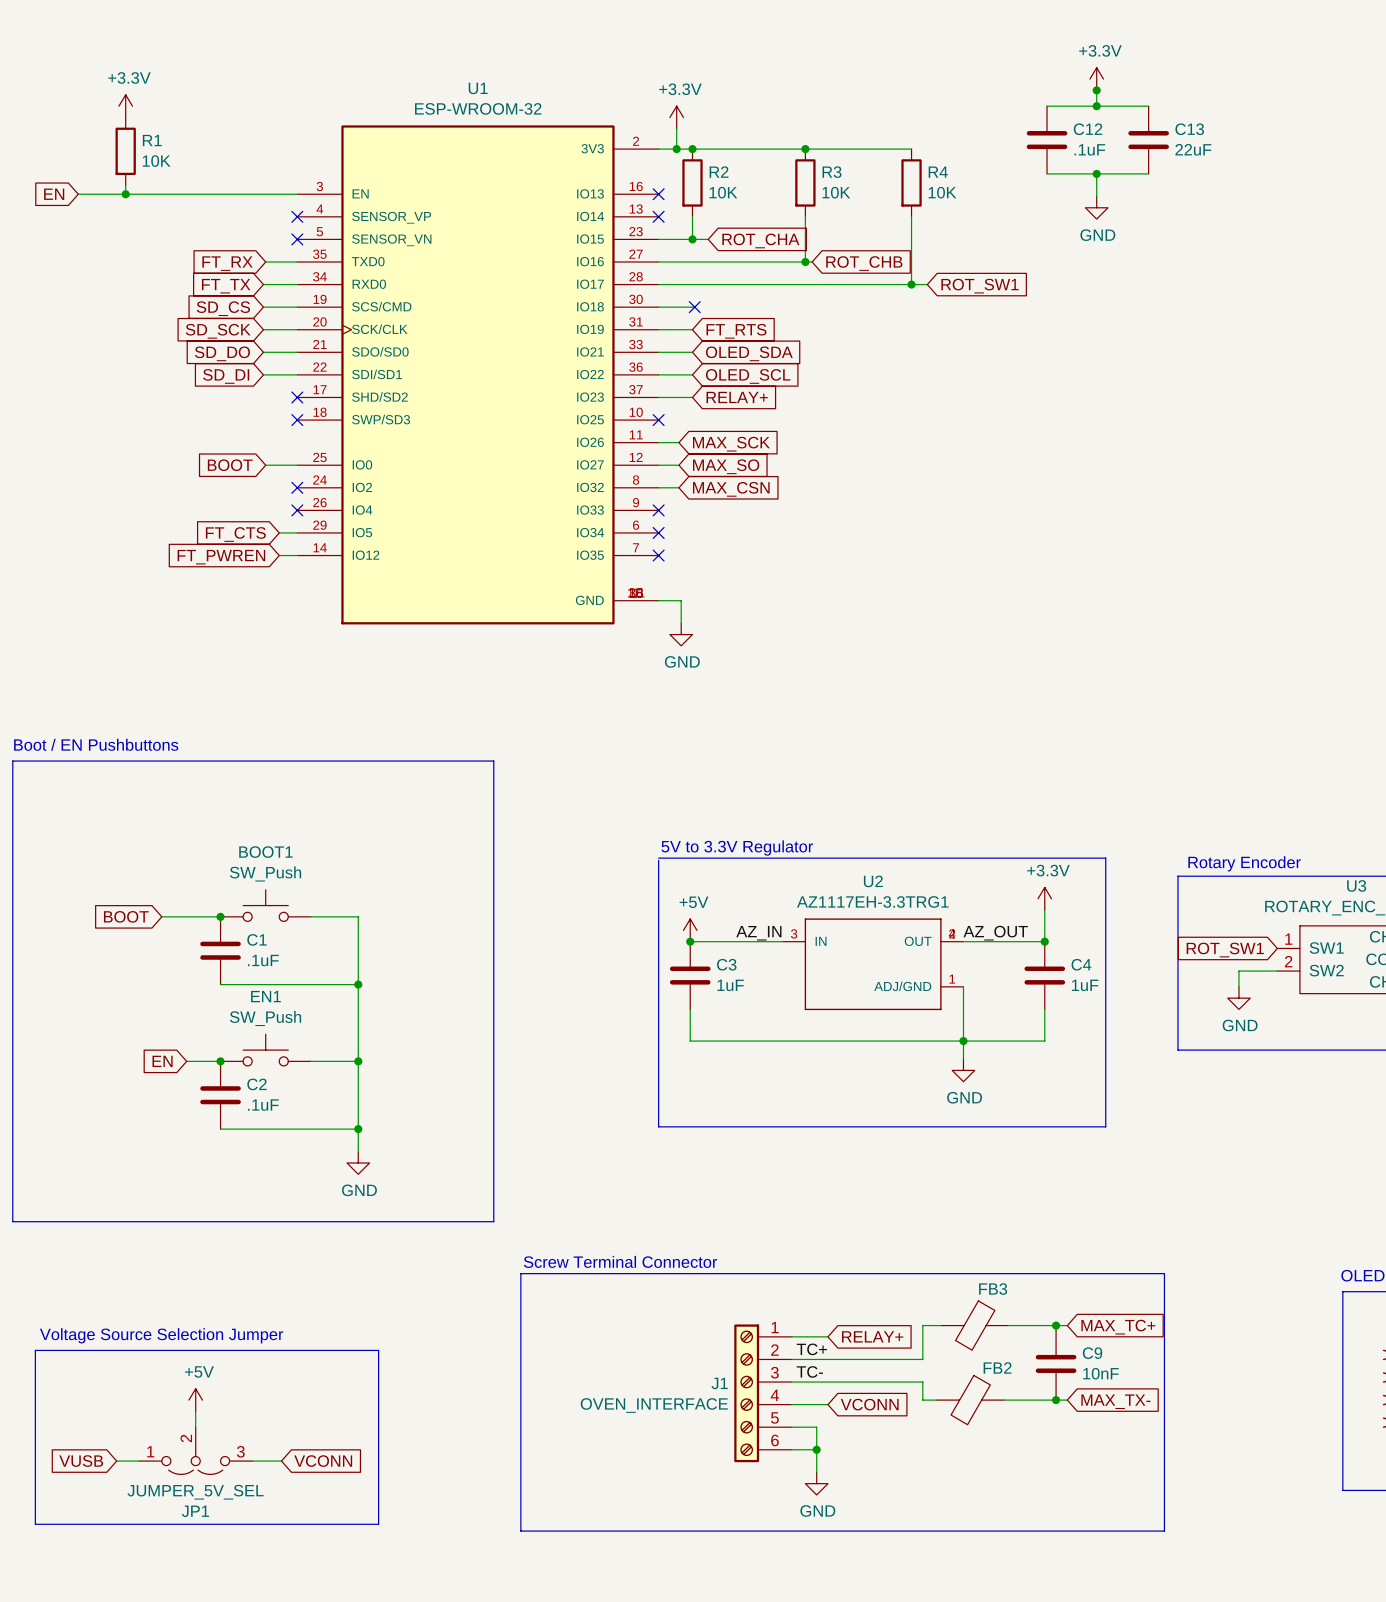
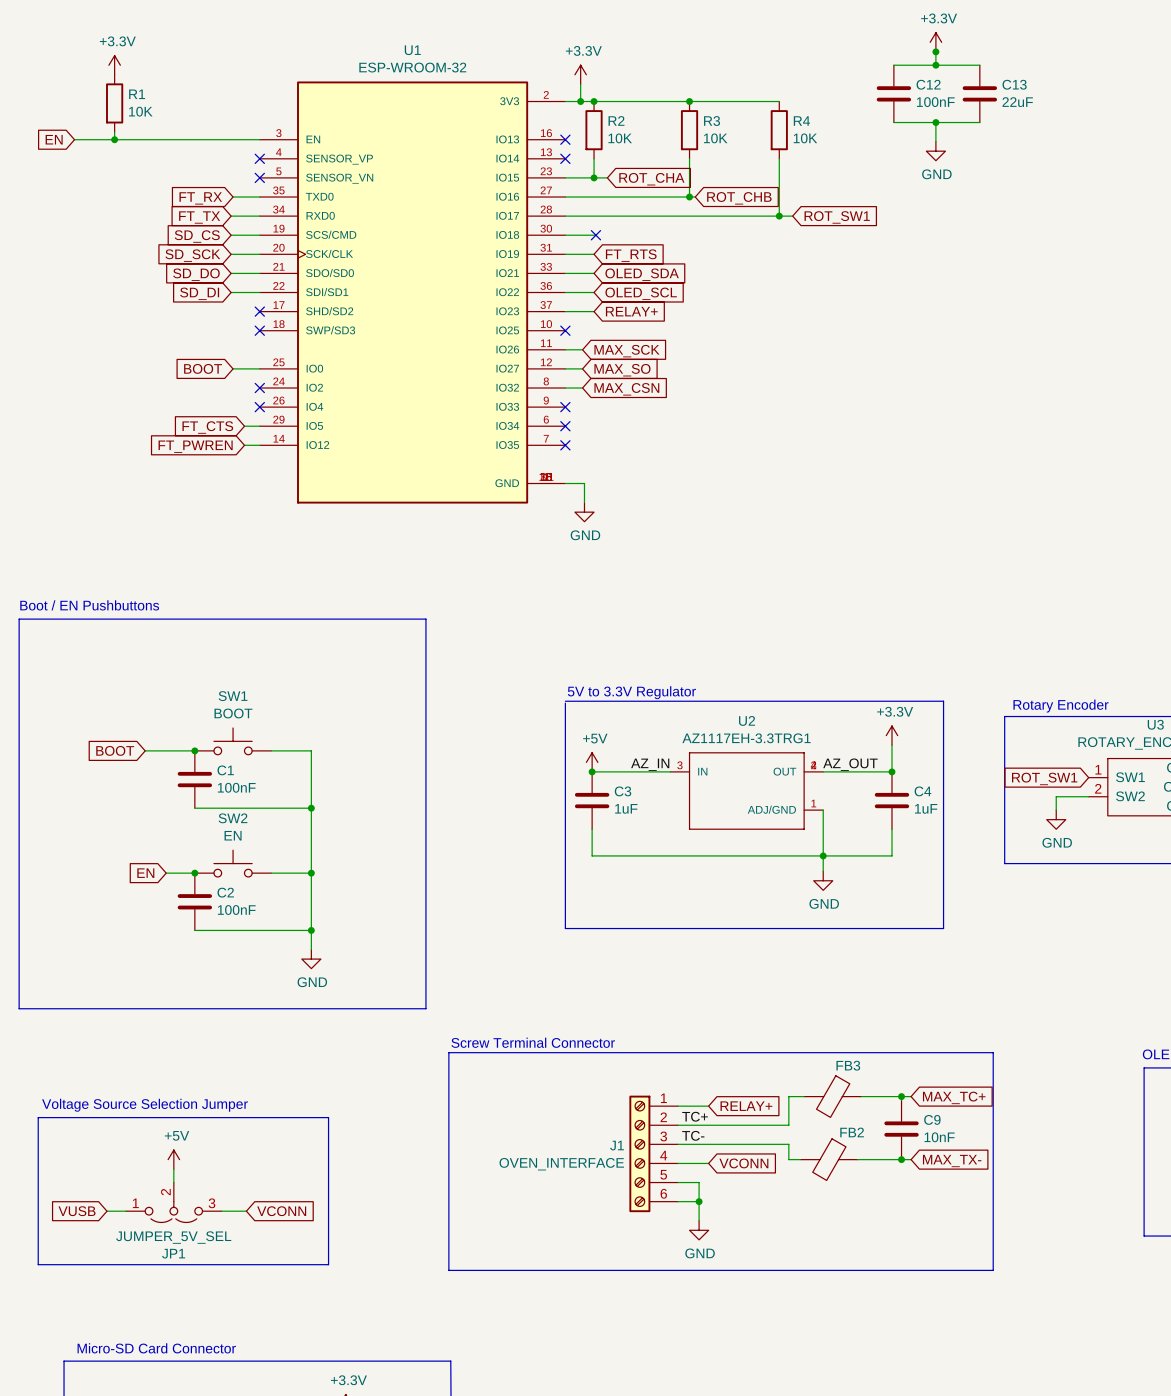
C12 value: .1uF (1089, 149) -> 100nF (935, 102)
BOOT1 name: BOOT1 (265, 852) -> SW1 (233, 696)
BOOT1 value: SW_Push (265, 873) -> BOOT (233, 713)
C1 value: .1uF (263, 960) -> 100nF (236, 787)
EN1 name: EN1 (265, 996) -> SW2 (233, 818)
EN1 value: SW_Push (265, 1018) -> EN (233, 835)
C2 value: .1uF (263, 1105) -> 100nF (236, 910)

